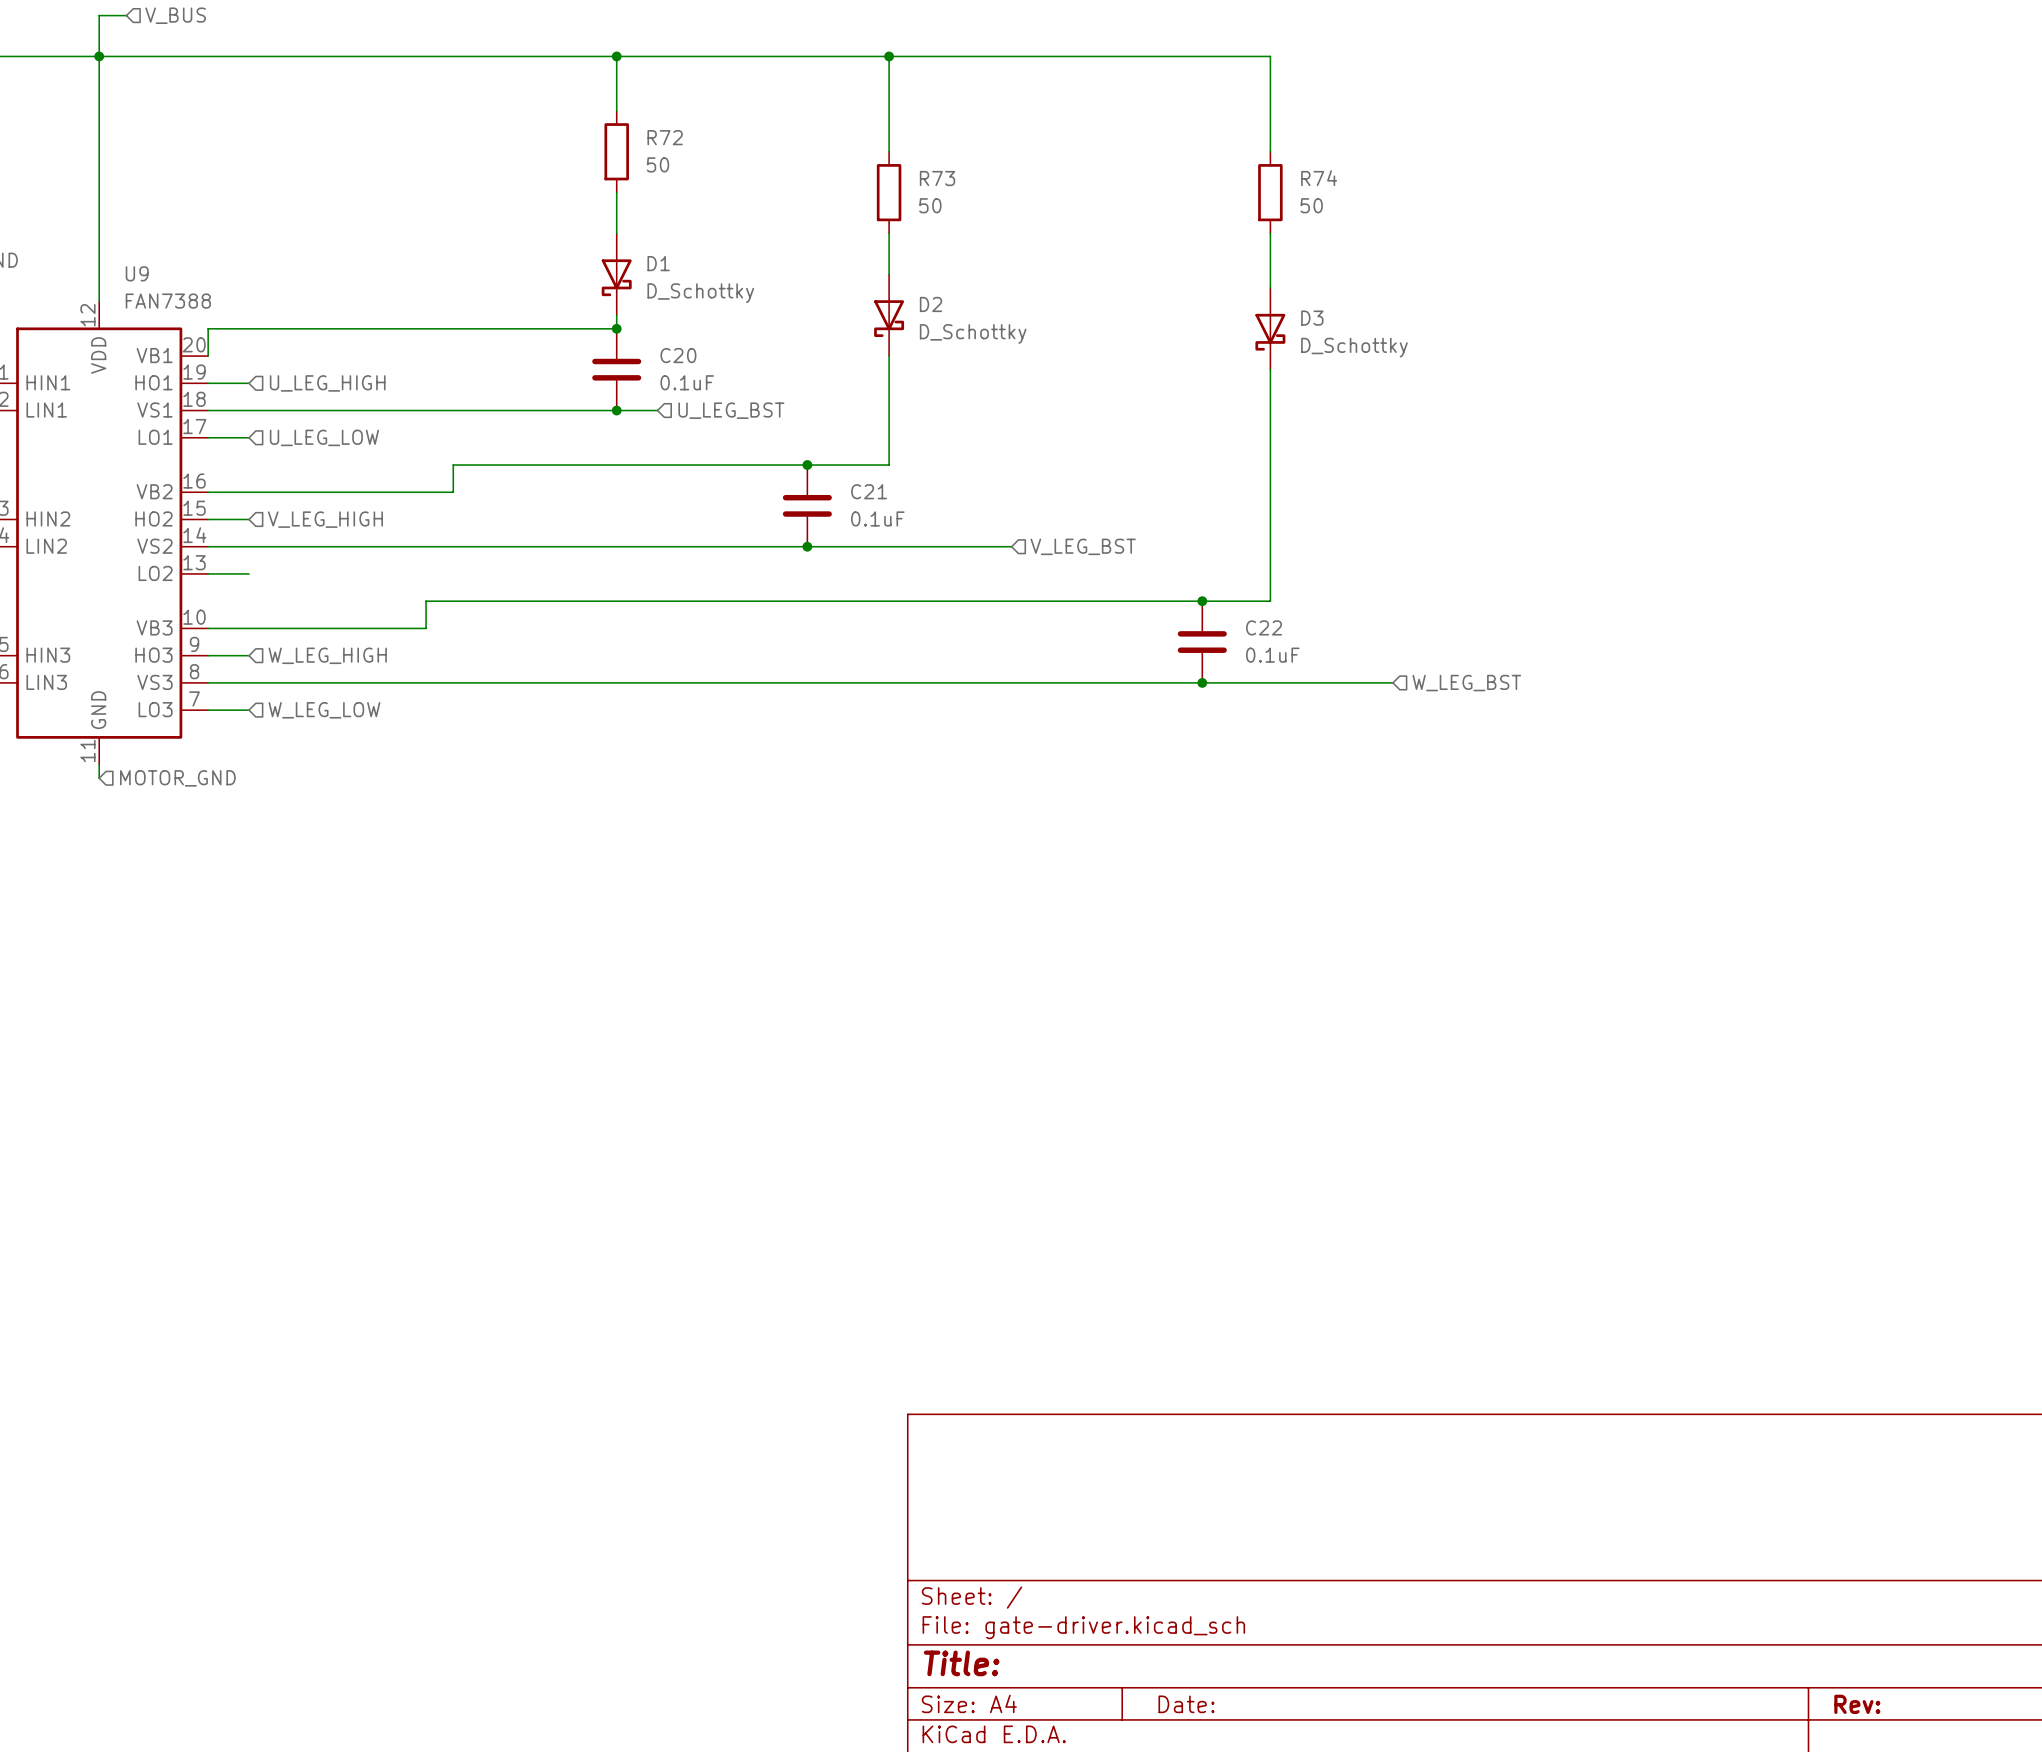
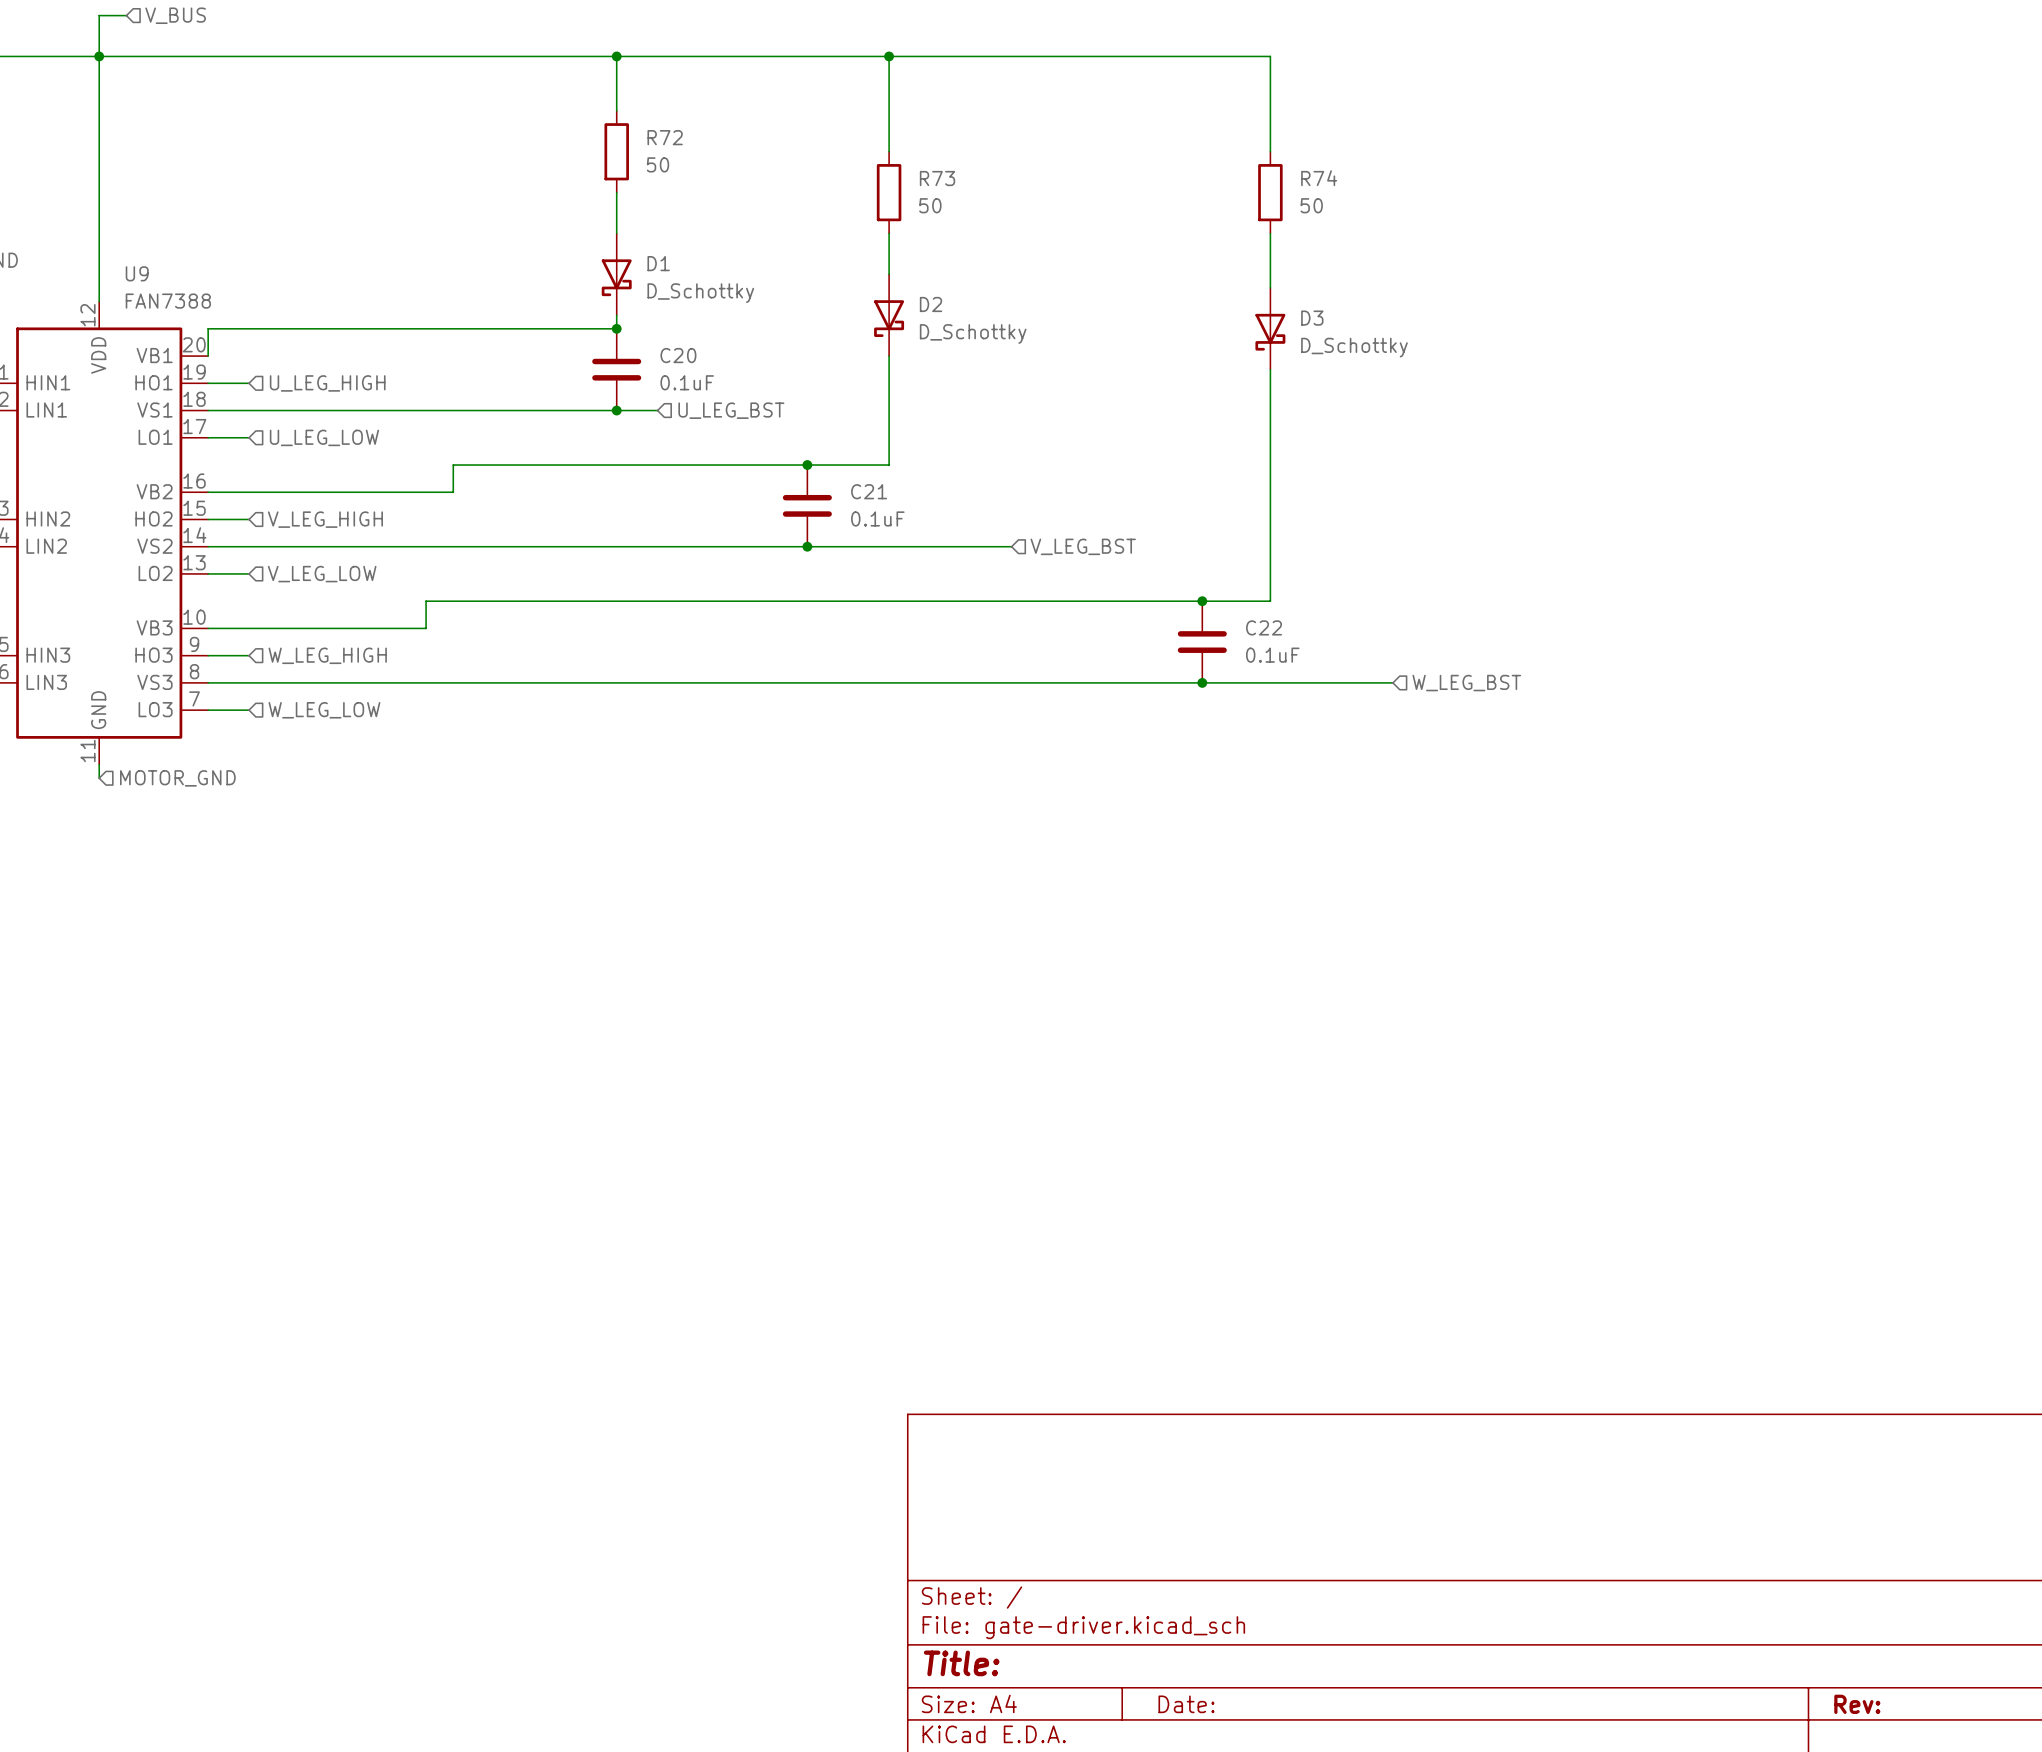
hierarchical label: none -> V_LEG_LOW (322, 574)

